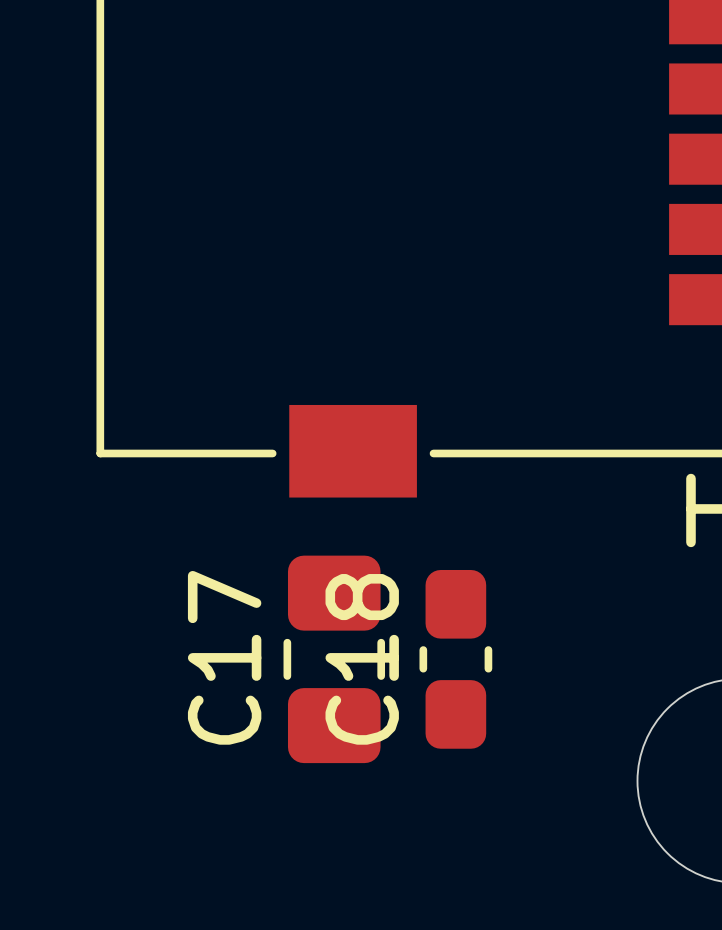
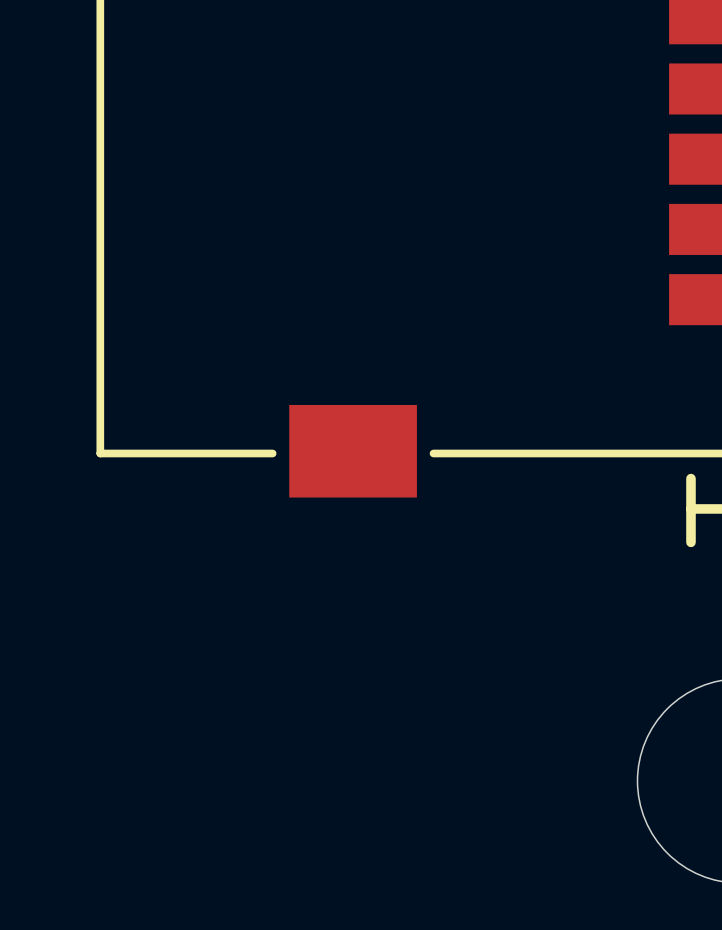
C17: (334, 659) -> none
C18: (455, 659) -> none

